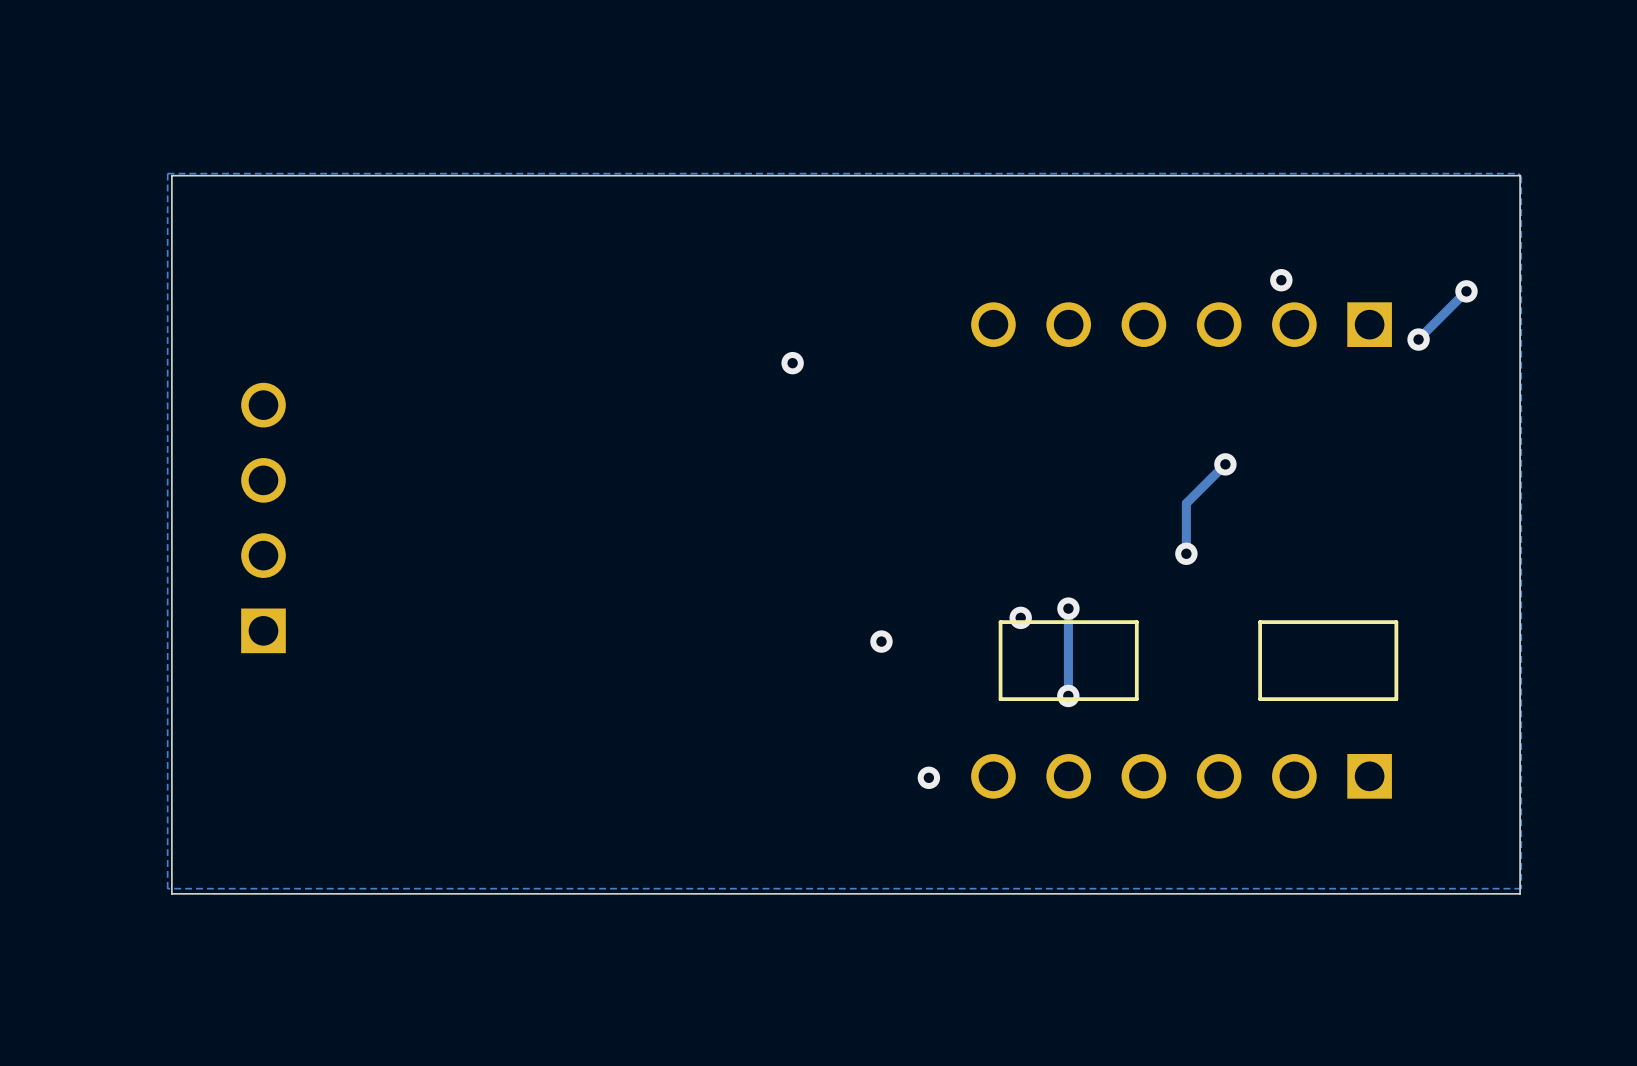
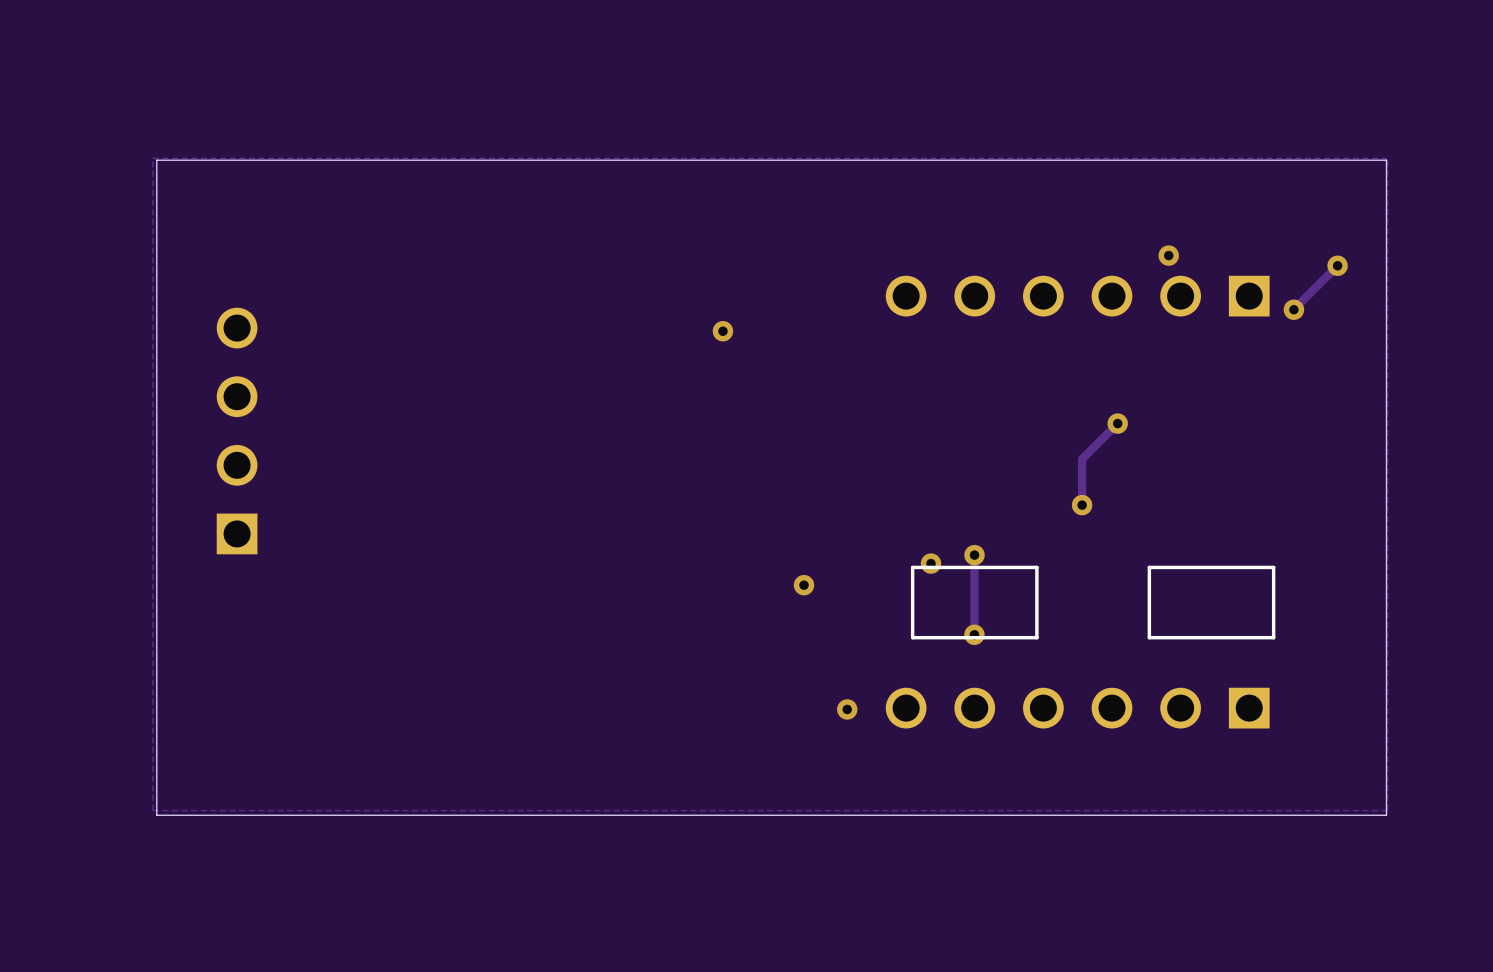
part position: (263, 517) -> (237, 431)

